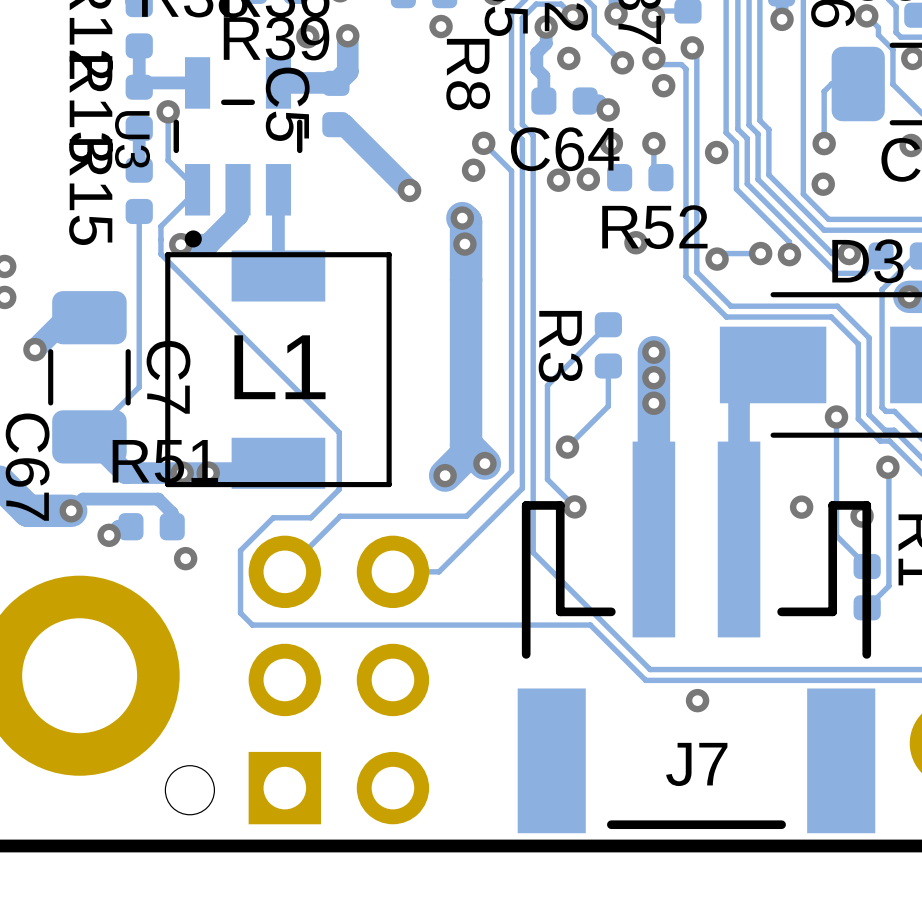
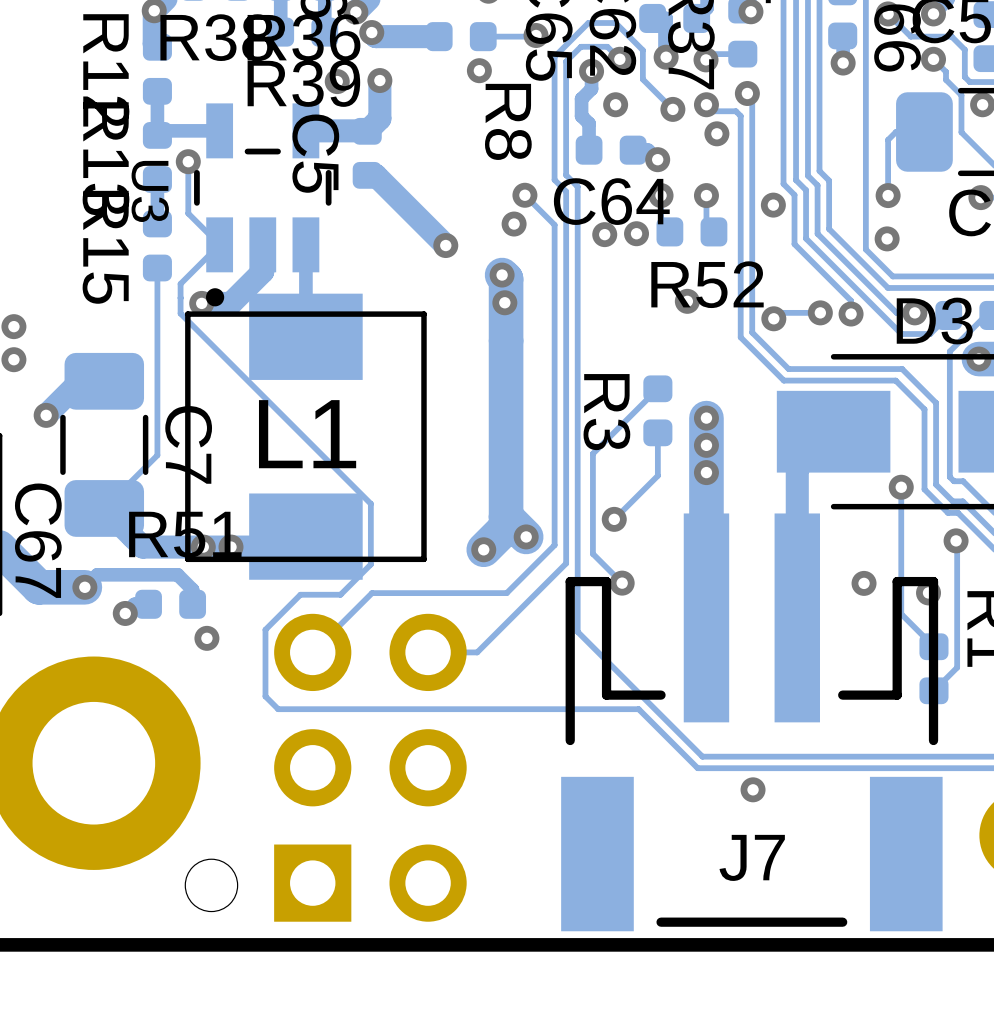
L1 footprint: [165, 250, 392, 489] -> [185, 293, 427, 580]

